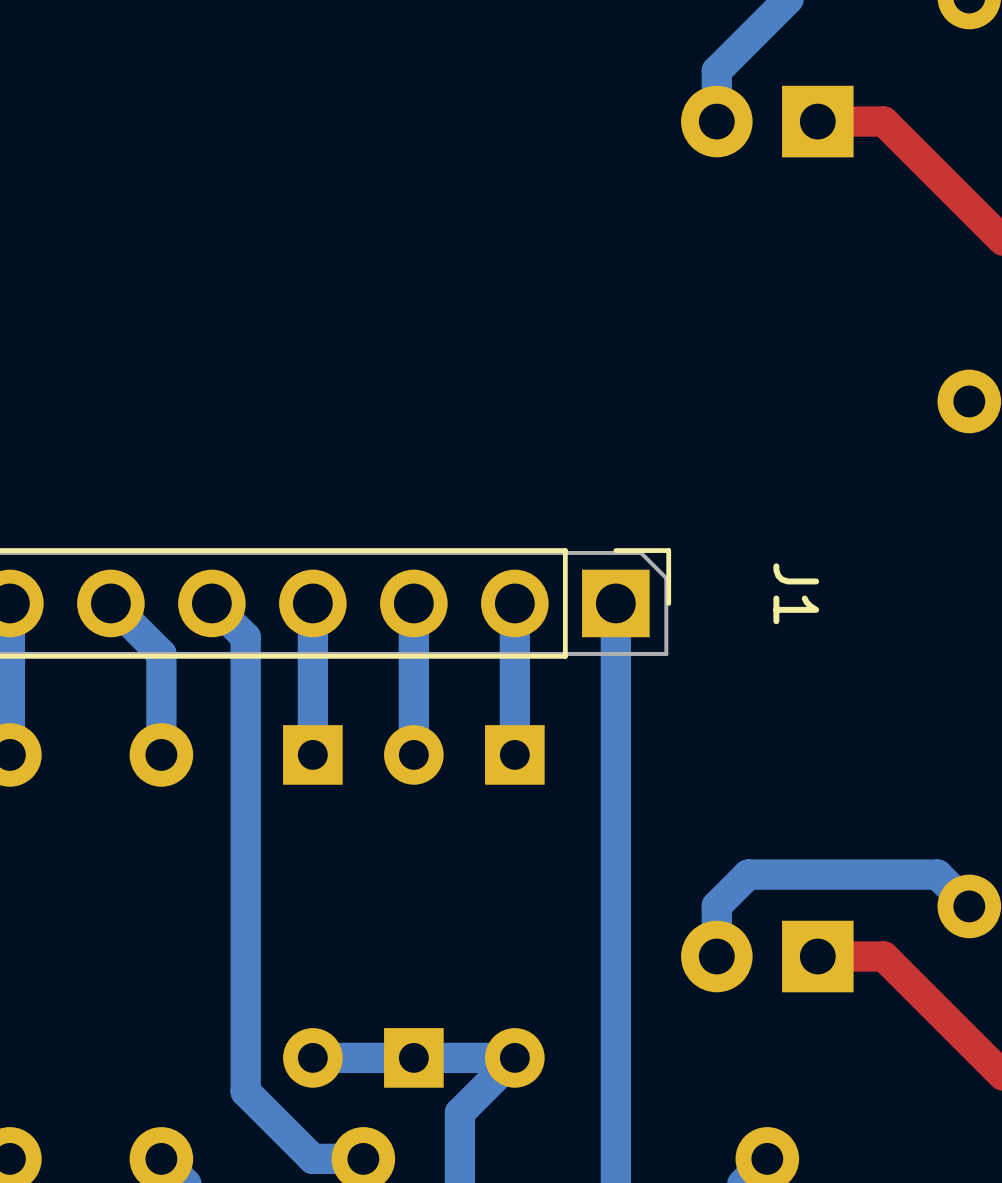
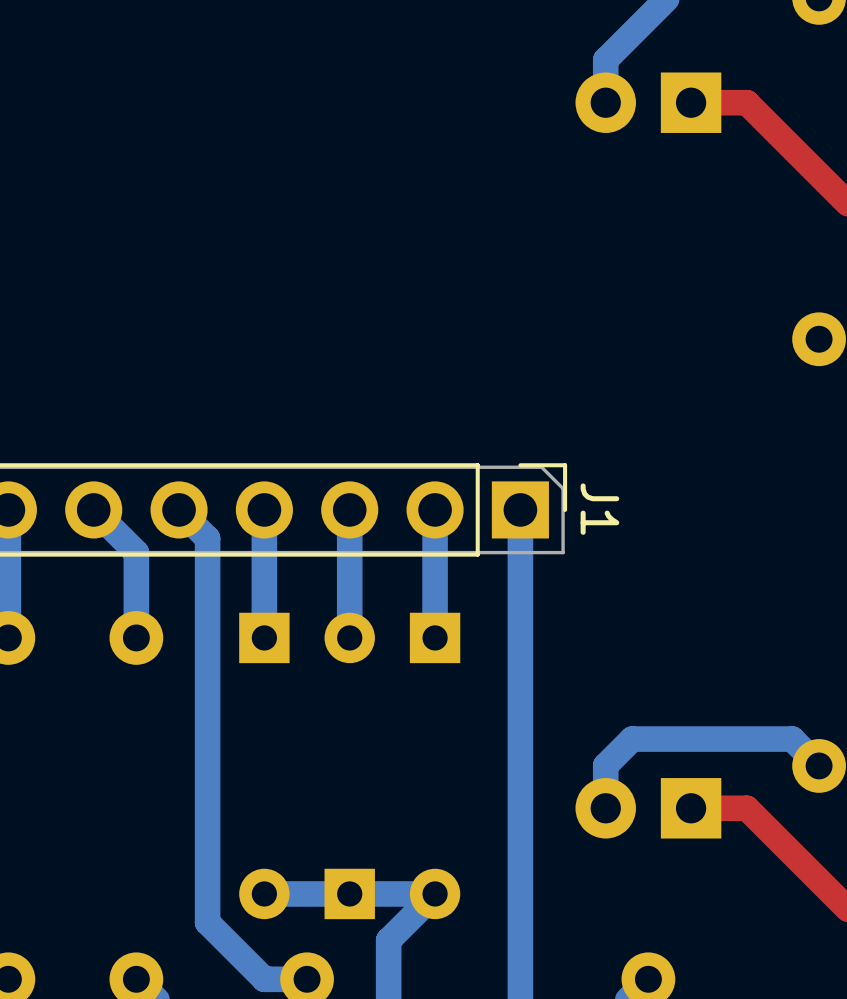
J1 name position: J1 (796, 593) -> J1 (599, 509)

